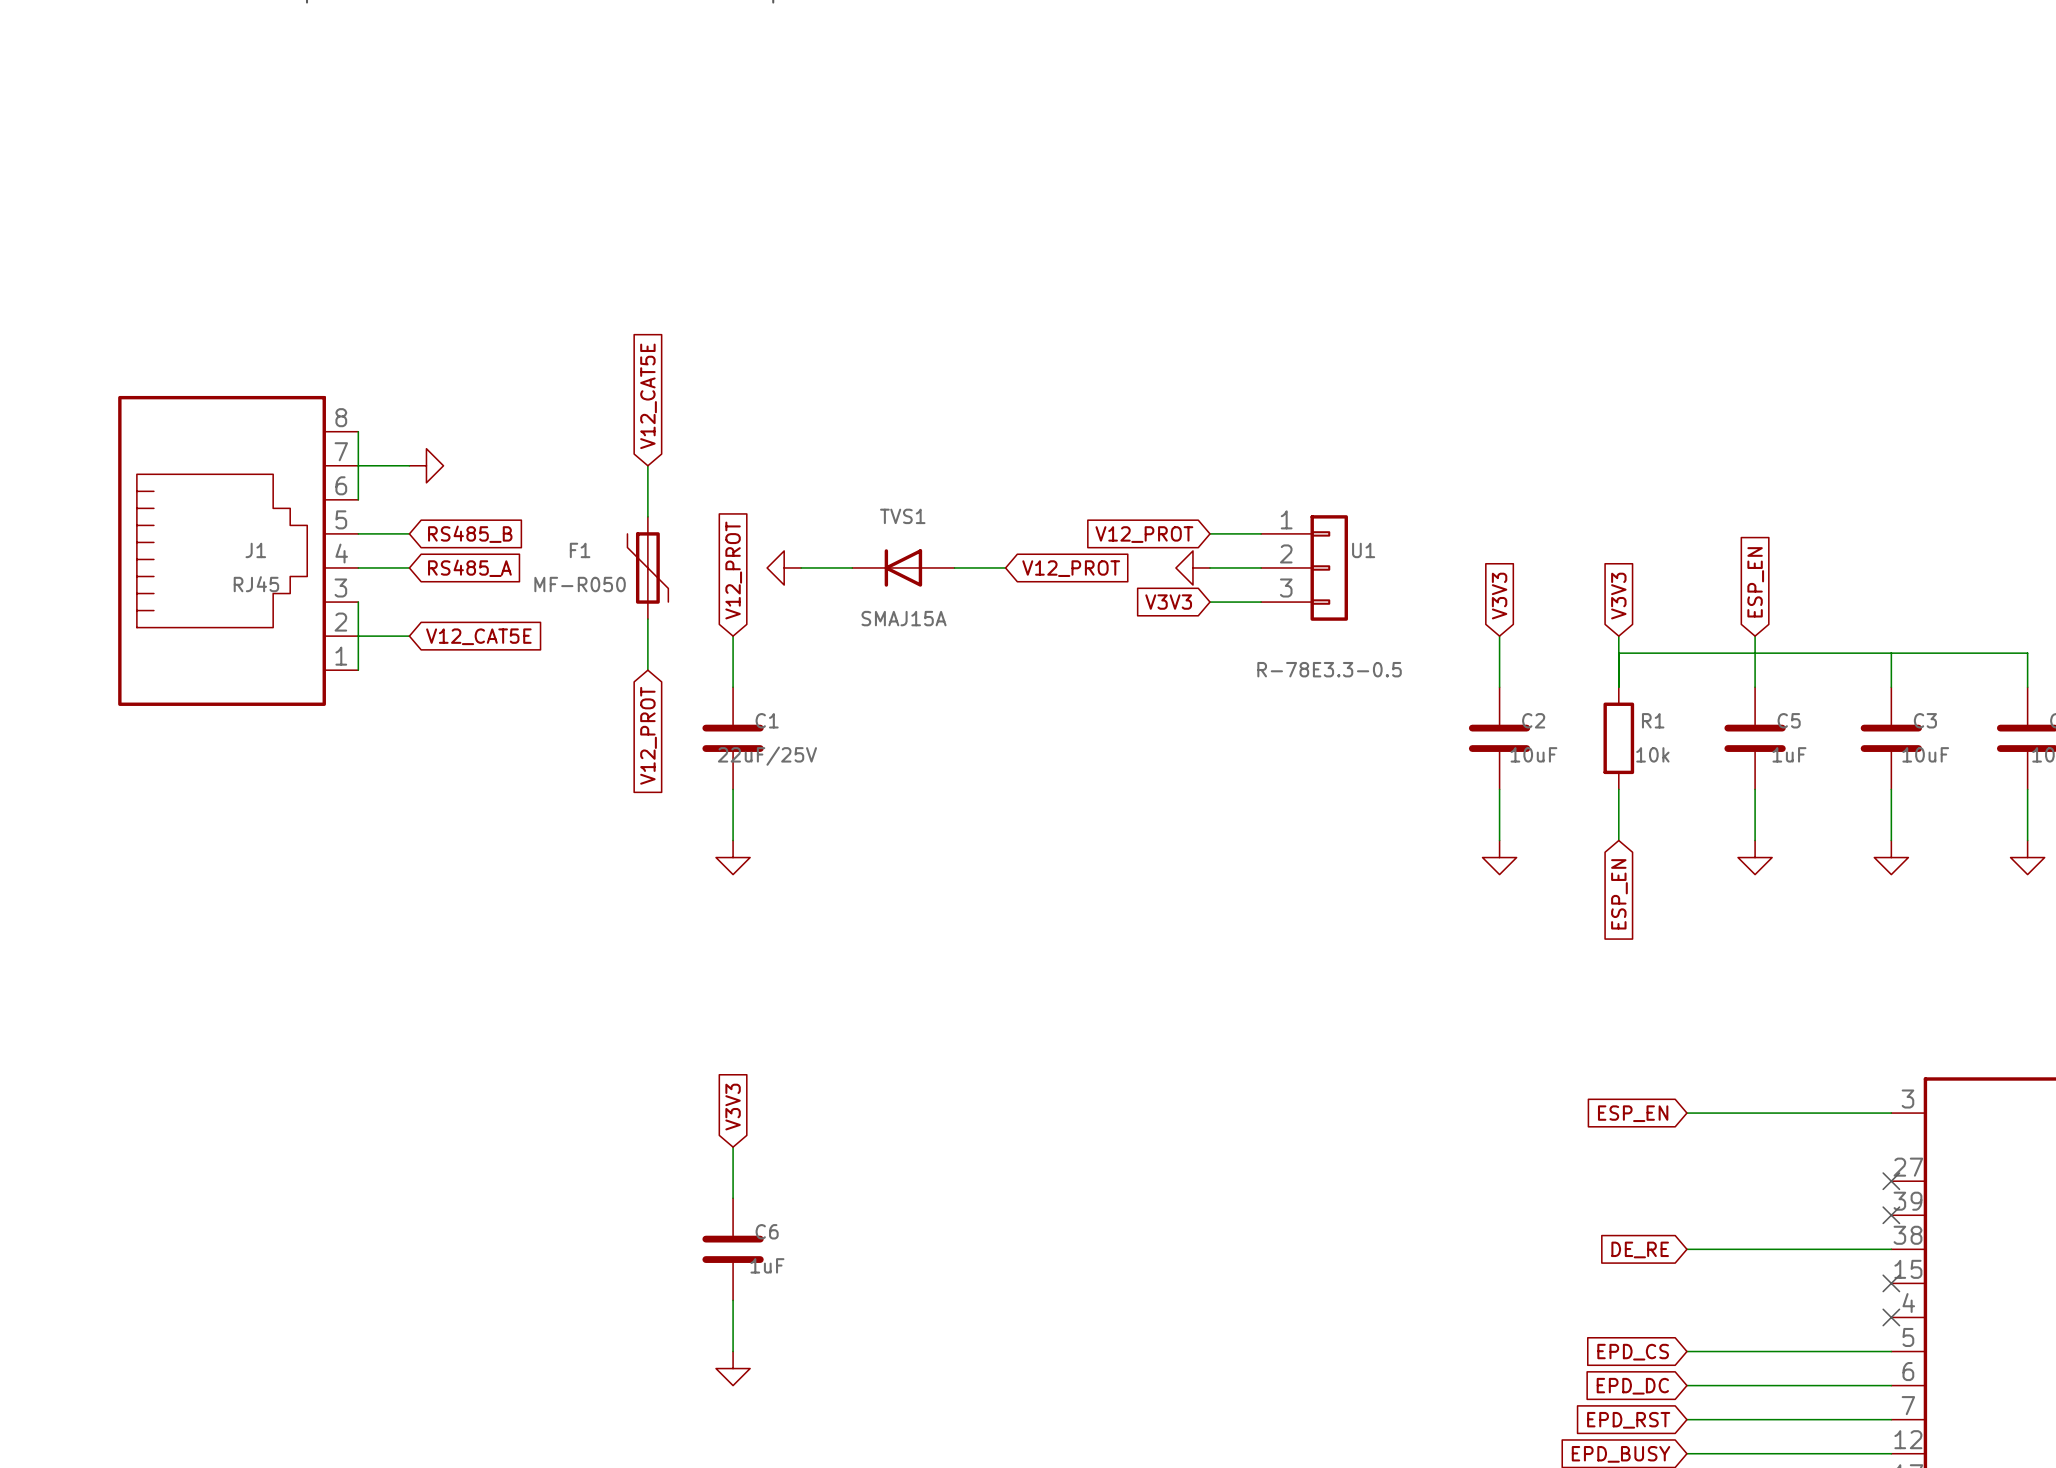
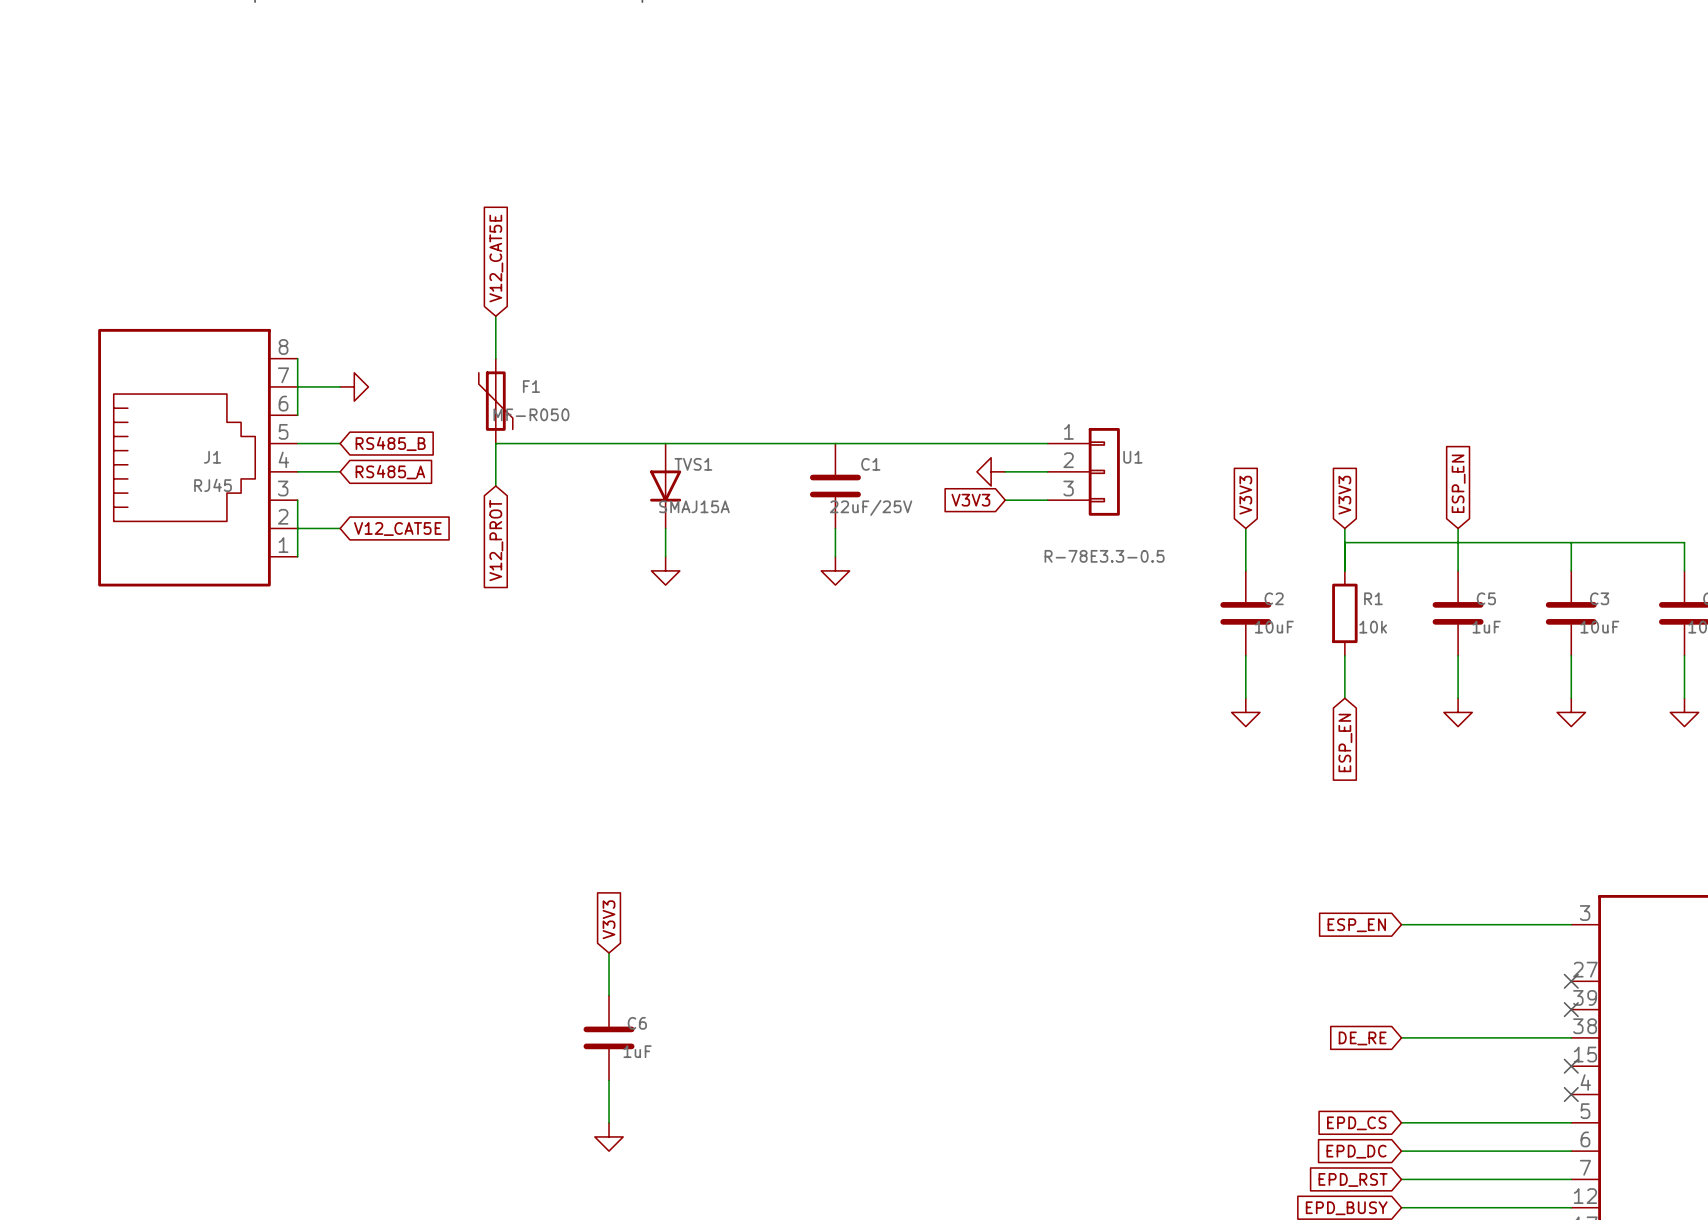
global label position: V12_CAT5E (648, 396) -> V12_CAT5E (496, 258)
wire: (647, 465) (647, 516) -> (495, 316) (495, 358)
TVS1 name position: TVS1 (902, 516) -> TVS1 (693, 464)
wire: none -> (1005, 443) (495, 443) (495, 486)
global label: V12_PROT (1144, 534) -> none
F1 name position: F1 (580, 550) -> F1 (531, 386)
F1 position: (647, 567) -> (495, 401)
power symbol: (784, 567) -> none
wire: (801, 567) (852, 567) -> none
TVS1 rotation: 0° (903, 567) -> 90° counterclockwise (665, 486)
TVS1 position: (903, 567) -> (665, 486)
wire: (954, 567) (1005, 567) -> none
global label: V12_PROT (1071, 568) -> none
global label: V12_PROT (733, 570) -> none
F1 value position: MF-R050 (580, 584) -> MF-R050 (531, 414)
TVS1 value position: SMAJ15A (904, 618) -> SMAJ15A (694, 506)
wire: (647, 619) (647, 670) -> none
wire: (733, 636) (733, 687) -> none
wire: none -> (665, 528) (665, 556)
wire: none -> (835, 528) (835, 556)
global label: none -> V12_PROT (496, 540)
power symbol: none -> (665, 570)
power symbol: none -> (835, 570)
C1 name position: C1 (767, 720) -> C1 (870, 464)
global label: V12_PROT (648, 735) -> none
C1 position: (733, 738) -> (835, 486)
C1 value position: 22uF/25V (767, 756) -> 22uF/25V (871, 507)
wire: (733, 789) (733, 840) -> none
power symbol: (733, 857) -> none

